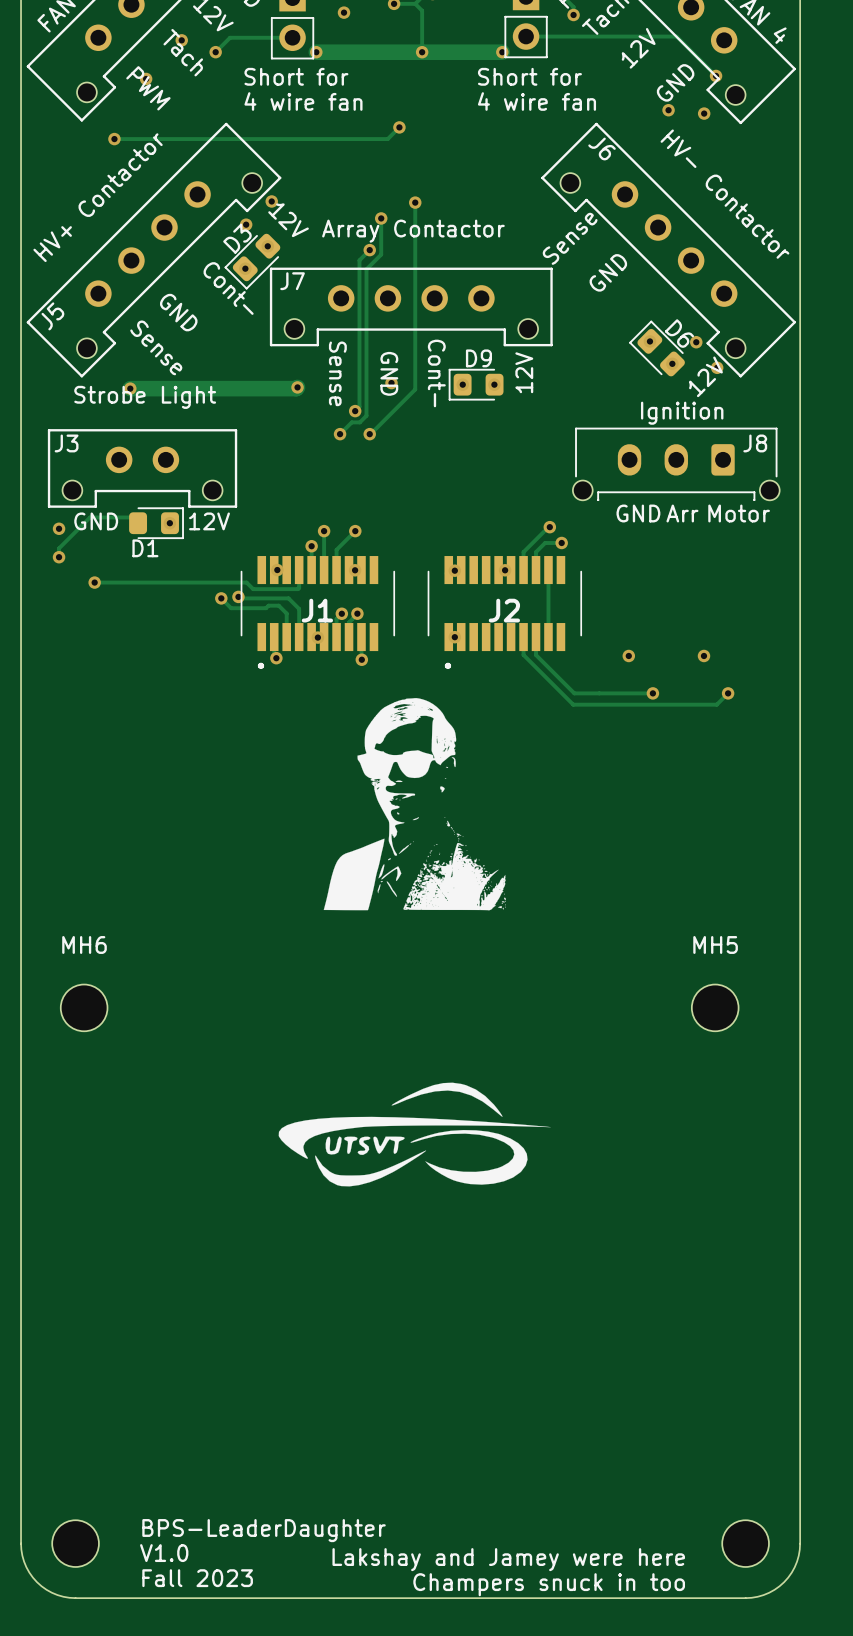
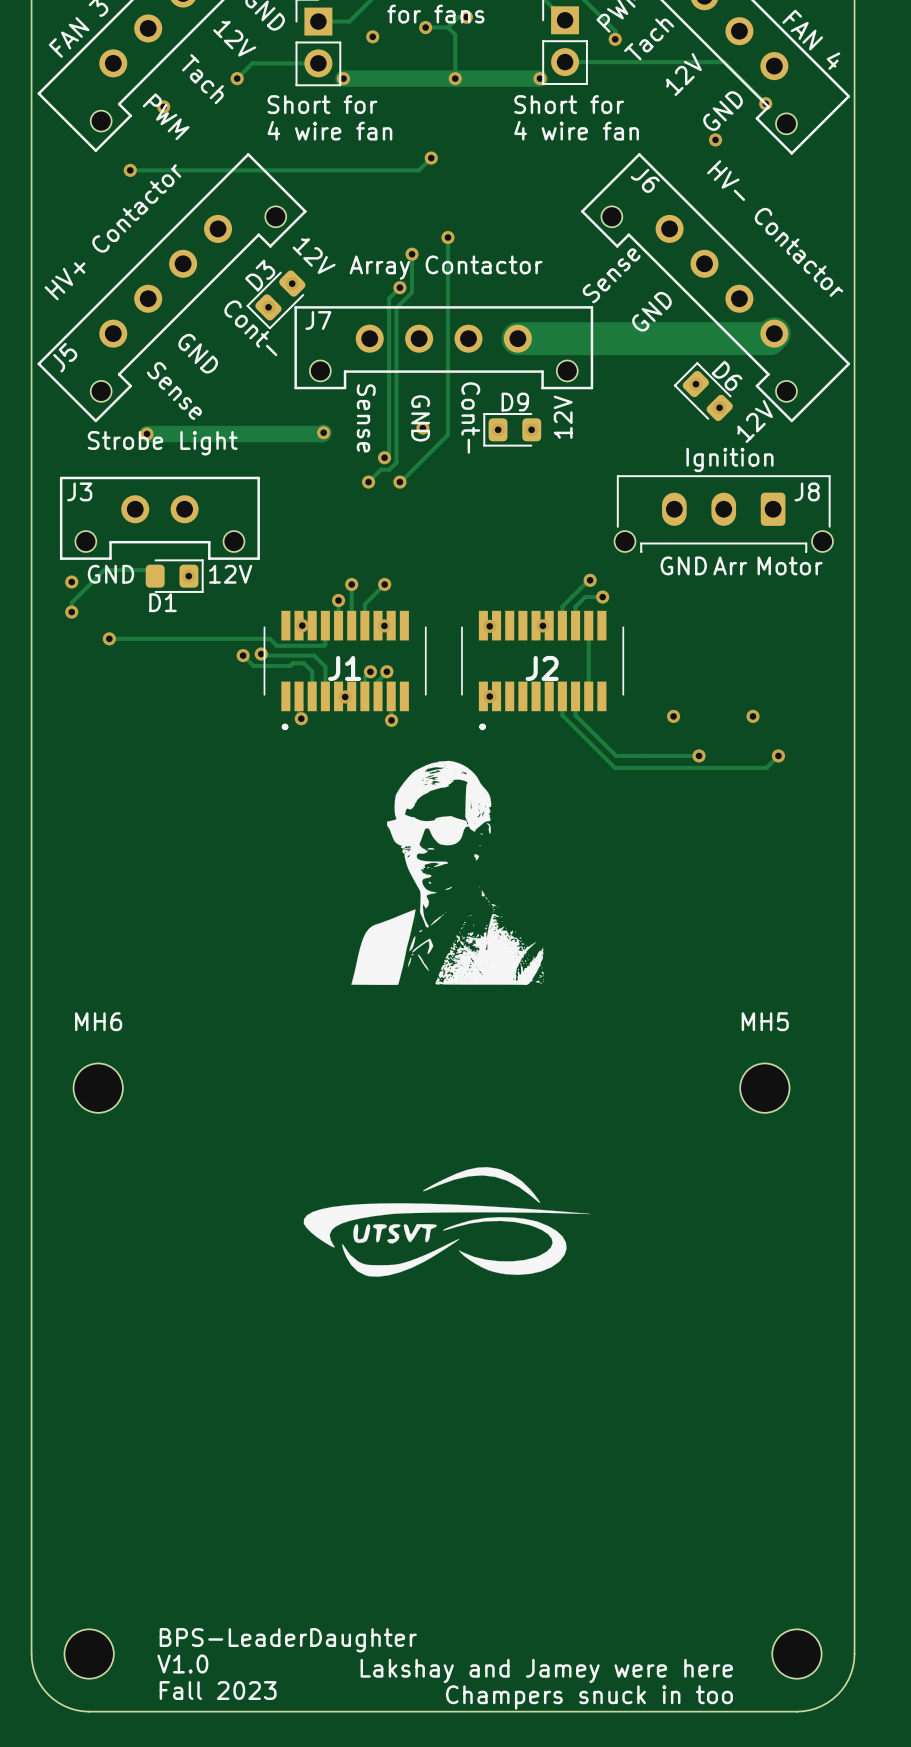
via: (181, 40) -> none
via: (704, 113) -> none
via: (271, 201) -> none
via: (246, 224) -> none
track: none -> (774, 333) (769, 338) (517, 338)
via: (696, 342) -> none
via: (717, 367) -> none

